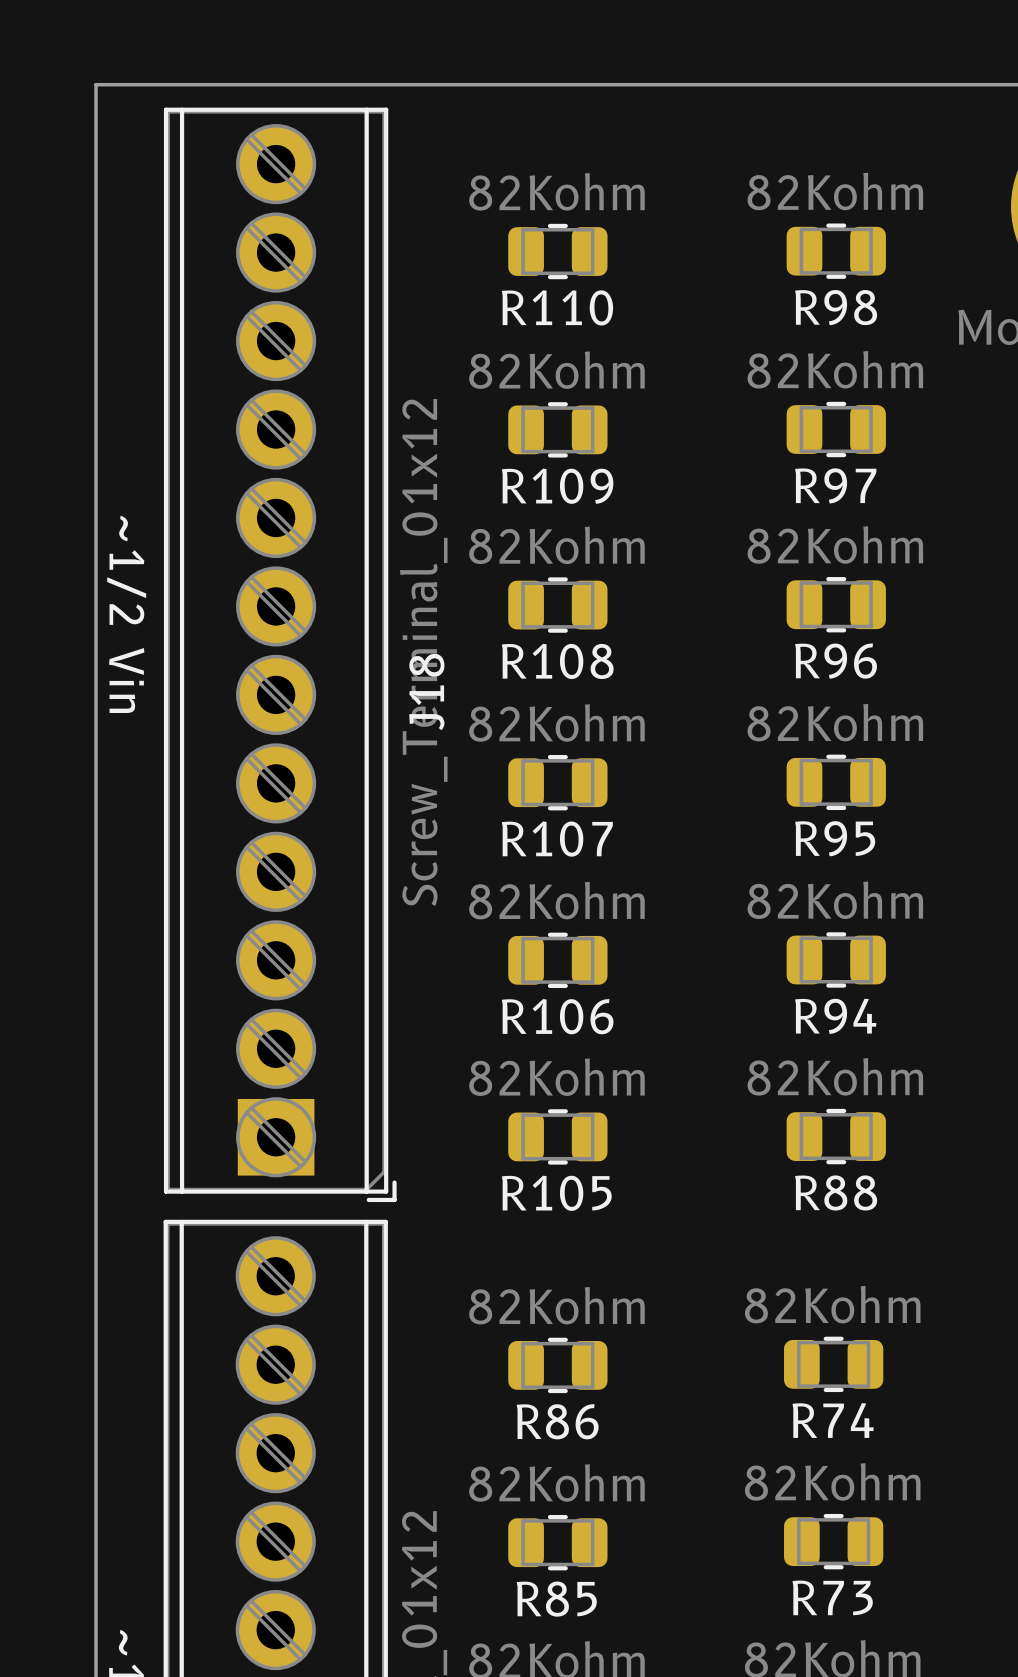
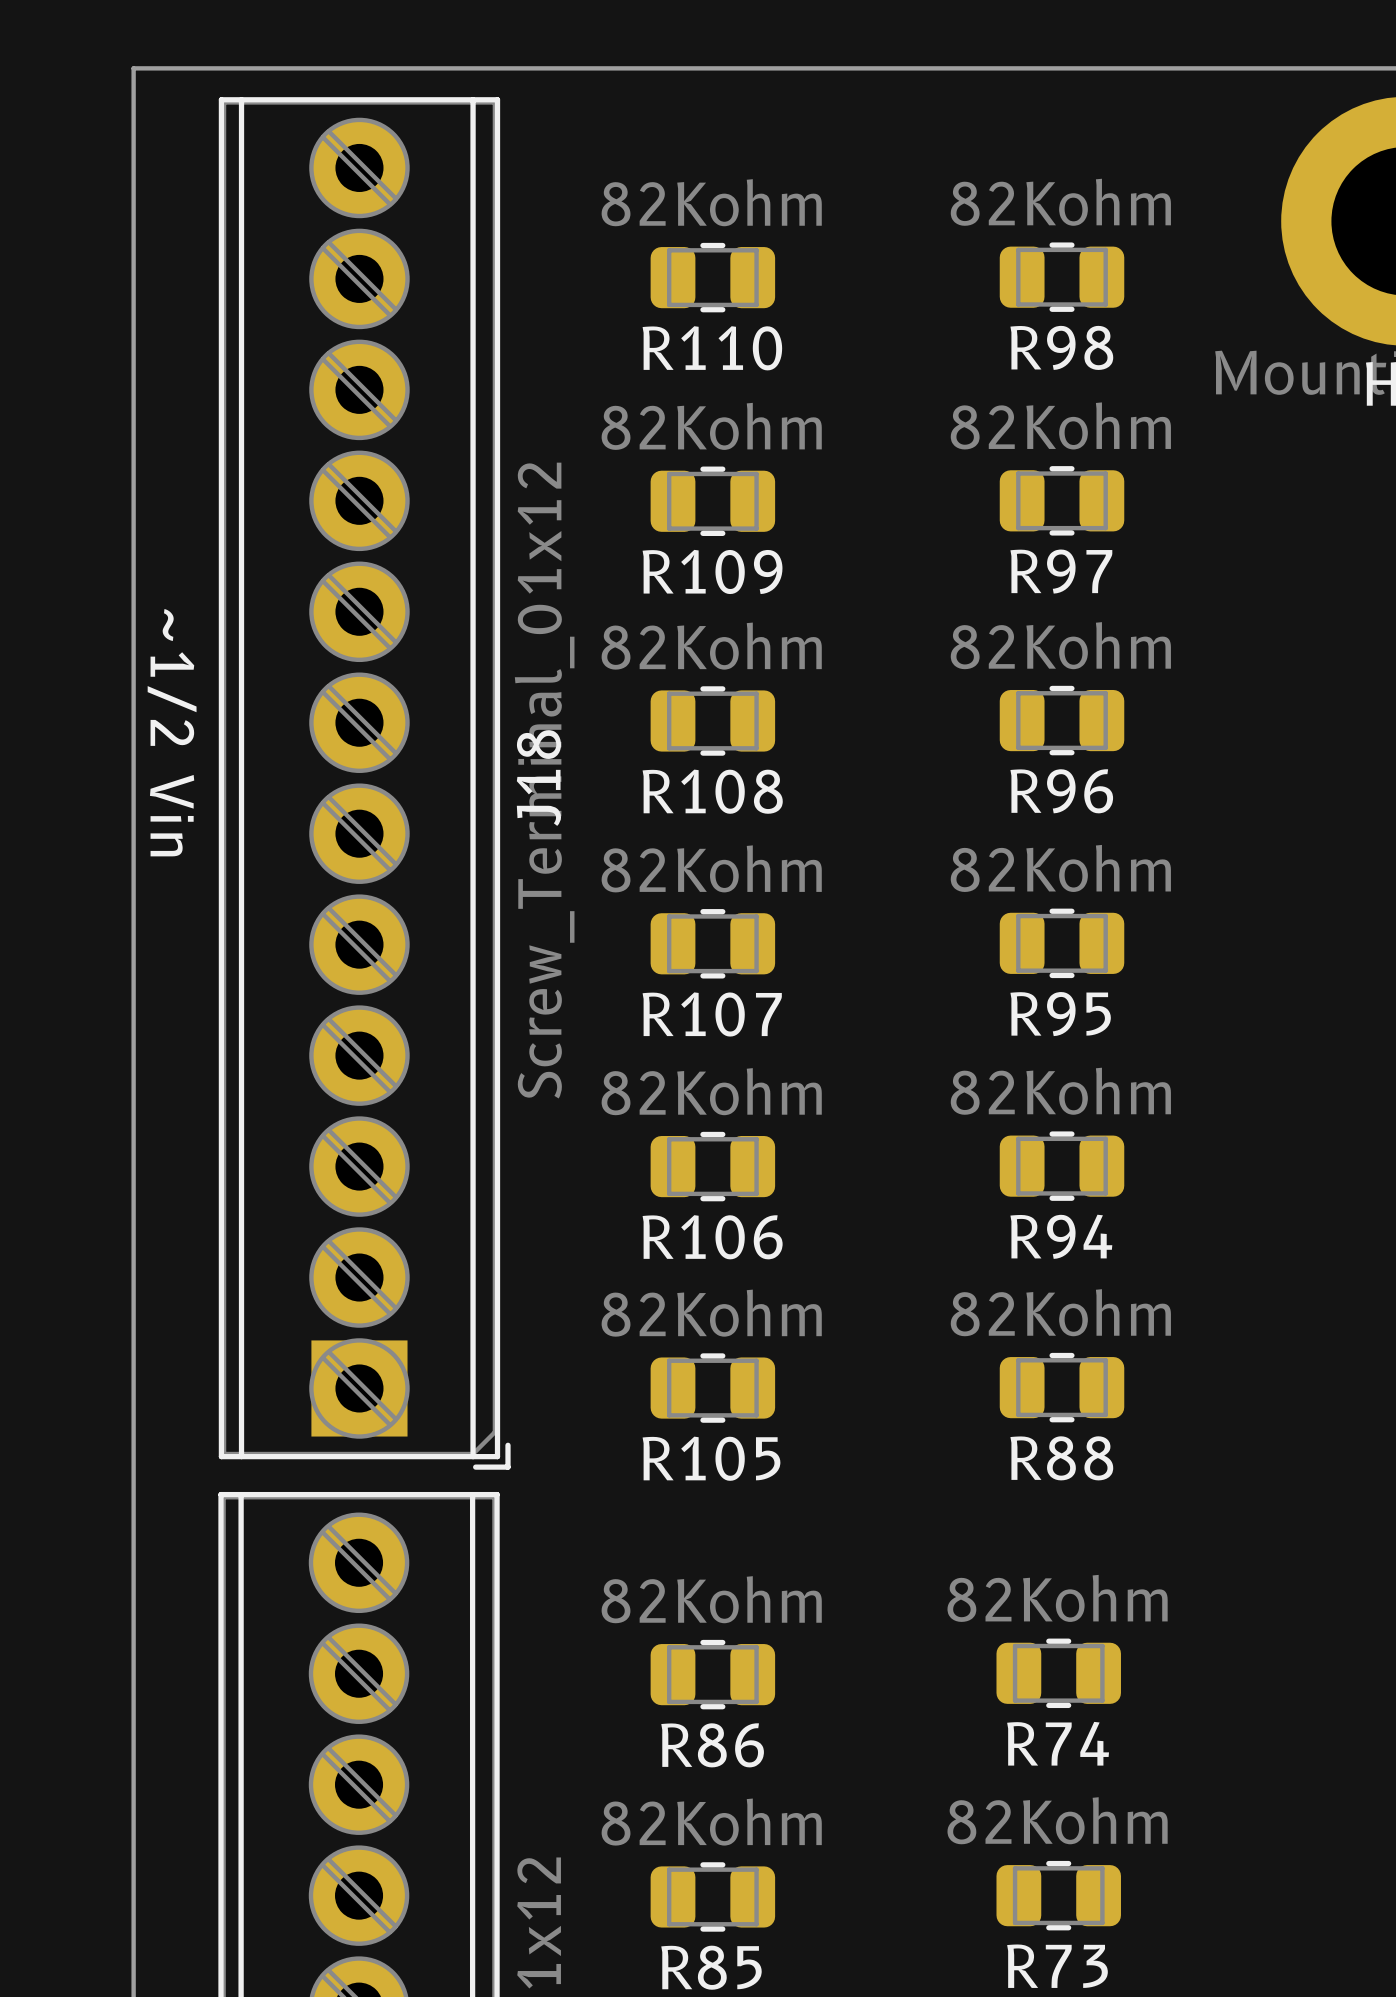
J18 name position: J18 (426, 691) -> J18 (538, 778)

